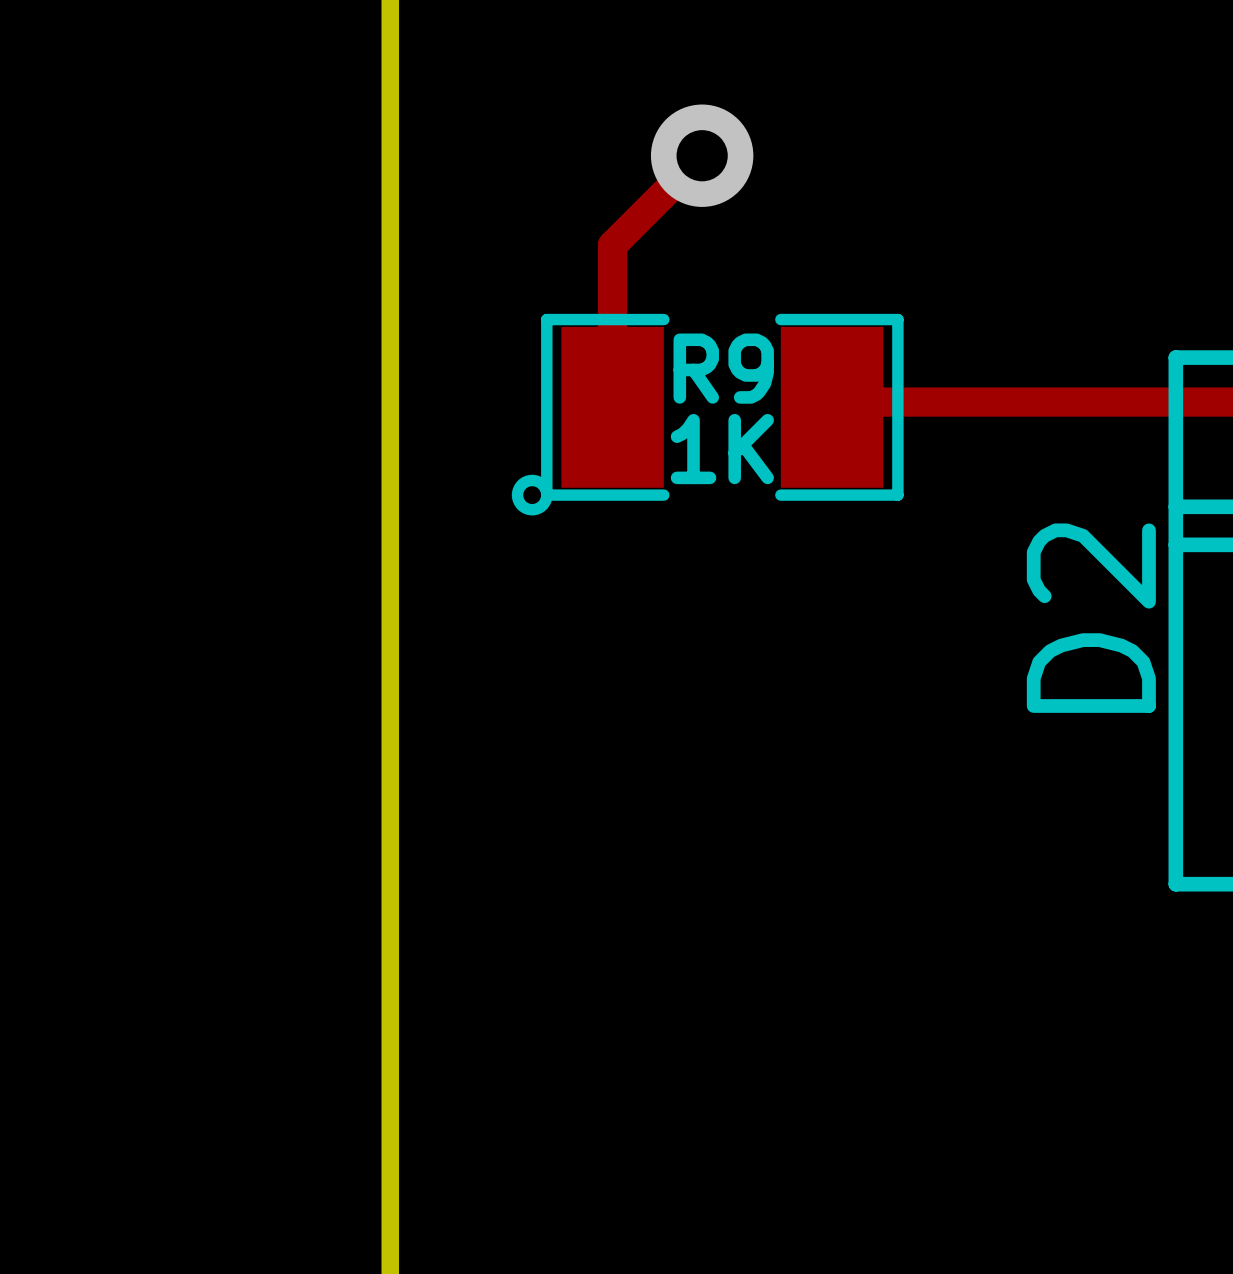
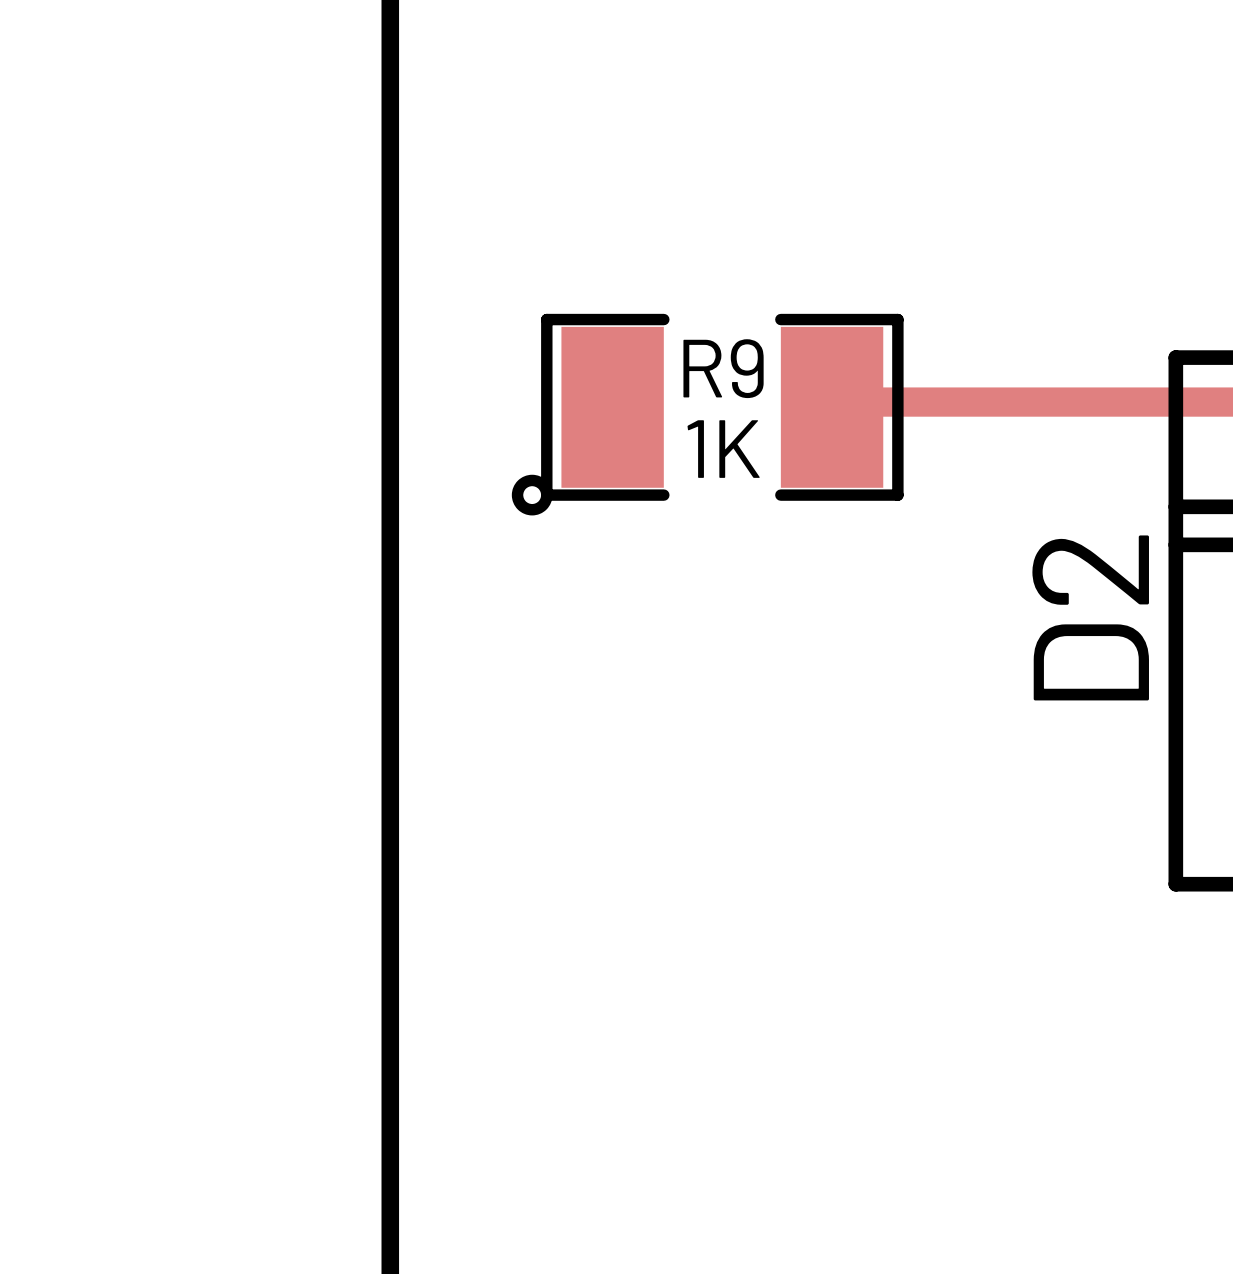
track: (702, 155) (612, 245) (612, 407) -> none
via: (702, 155) -> none

